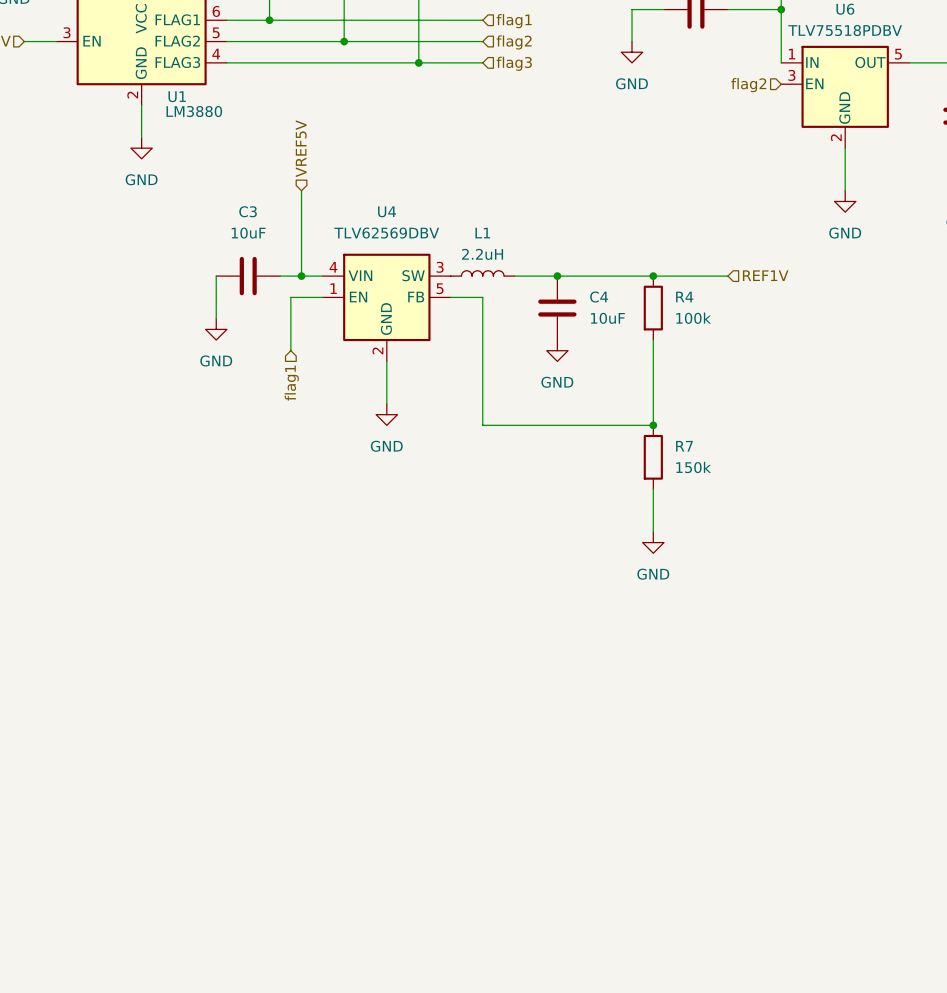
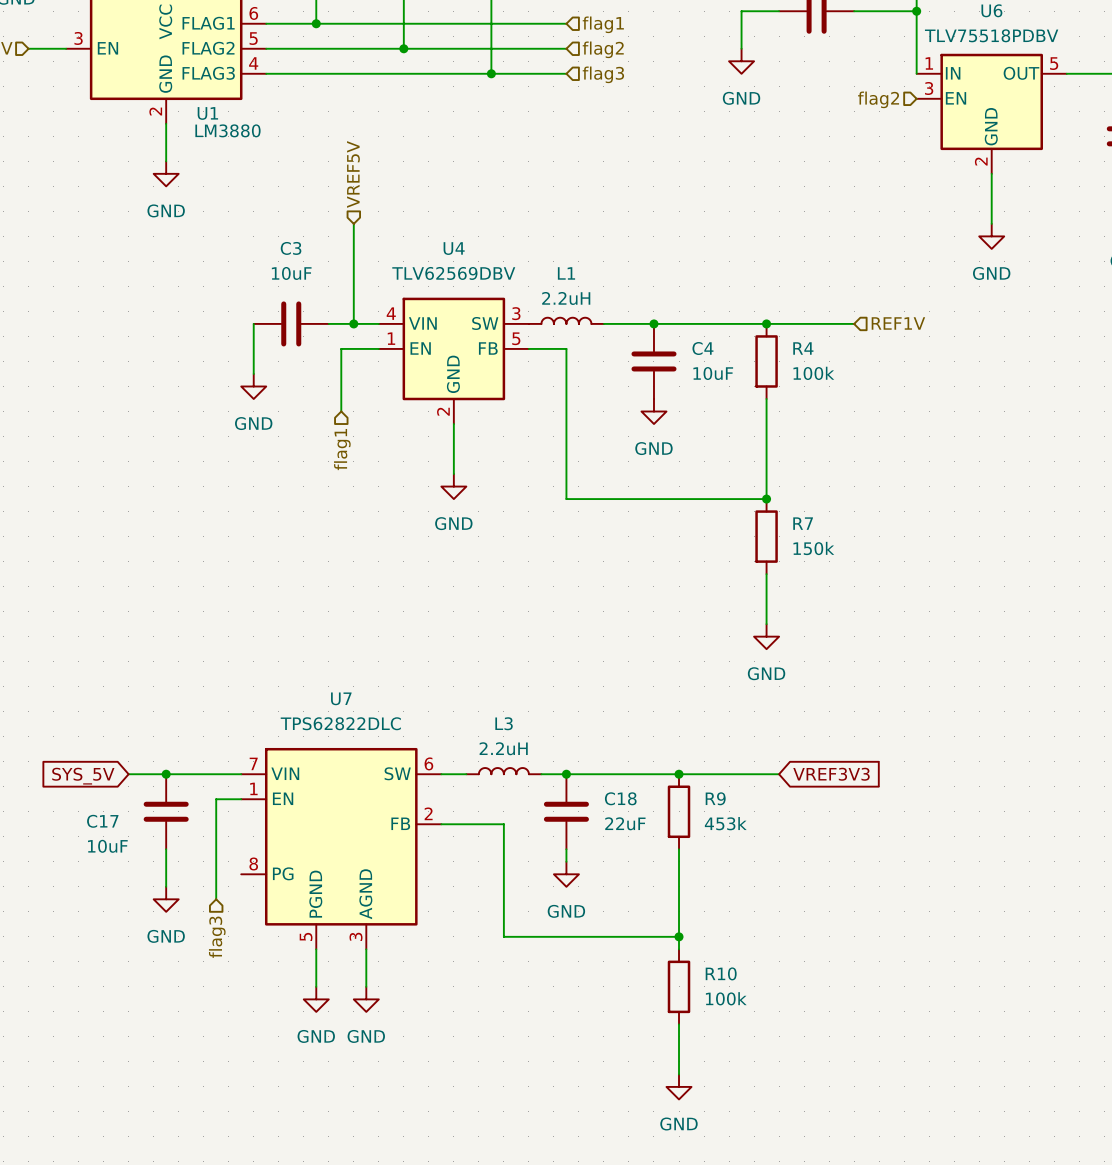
L3: none -> 2.2uH (503, 771)
wire: none -> (128, 774) (241, 774)
junction: none -> (166, 774)
wire: none -> (441, 774) (466, 774)
wire: none -> (541, 774) (779, 774)
junction: none -> (566, 774)
junction: none -> (679, 774)
global label: none -> VREF3V3 (831, 774)
global label: none -> SYS_5V (83, 776)
wire: none -> (241, 799) (216, 799) (216, 899)
C17: none -> 10uF (166, 811)
C18: none -> 22uF (566, 811)
R9: none -> 453k (679, 811)
wire: none -> (441, 824) (503, 824) (503, 936) (679, 936)
wire: none -> (166, 849) (166, 886)
U7: none -> TPS62822DLC (341, 848)
wire: none -> (566, 849) (566, 861)
wire: none -> (679, 849) (679, 949)
power symbol: none -> GND (566, 874)
power symbol: none -> GND (166, 899)
hierarchical label: none -> flag3 (217, 937)
junction: none -> (679, 936)
wire: none -> (316, 949) (316, 986)
wire: none -> (366, 949) (366, 986)
R10: none -> 100k (679, 986)
power symbol: none -> GND (316, 999)
power symbol: none -> GND (366, 999)
wire: none -> (679, 1024) (679, 1074)
power symbol: none -> GND (679, 1086)

